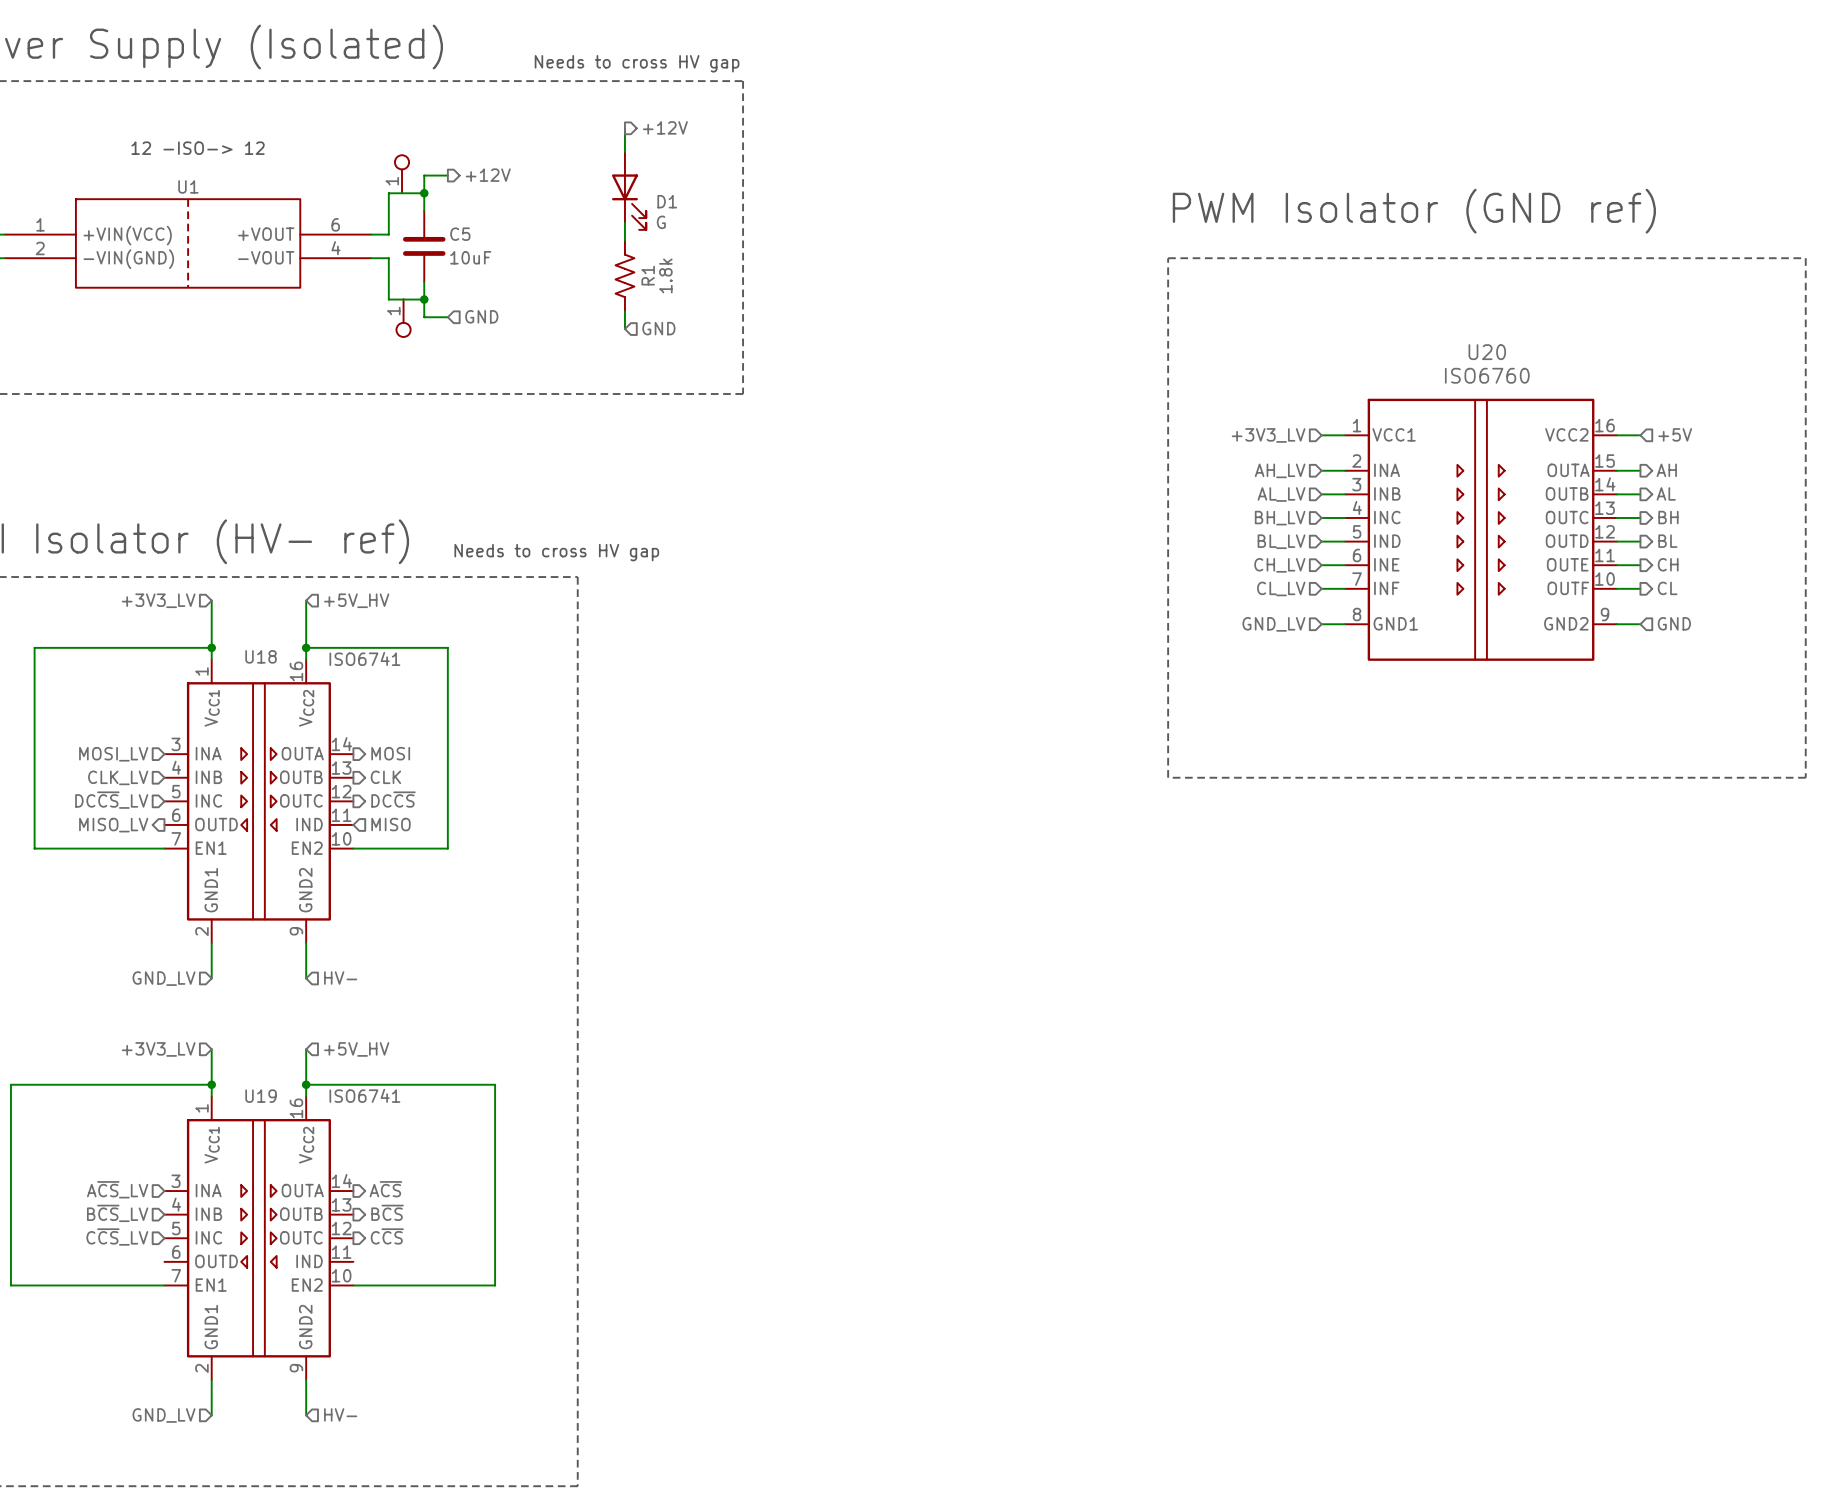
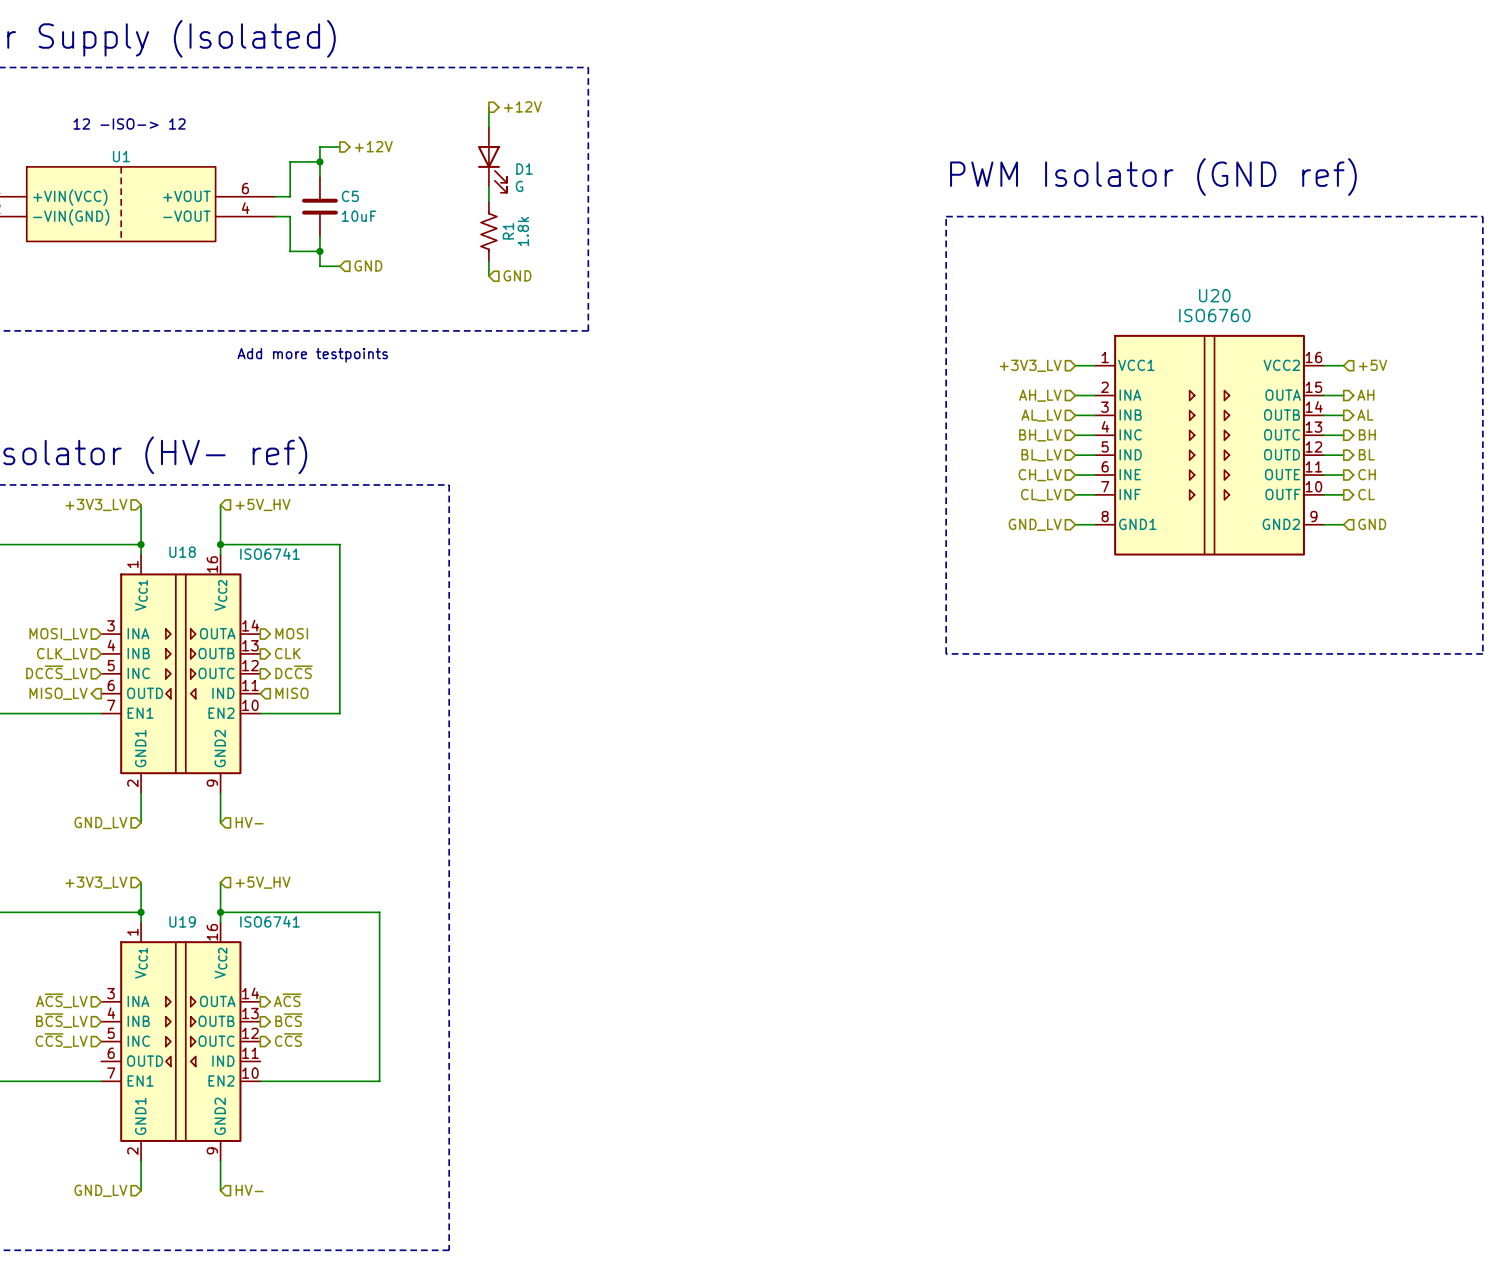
text: Needs to cross HV gap (637, 63) -> none
part: (402, 174) -> none
part: (403, 318) -> none
text: none -> Add more testpoints (312, 355)
text: Needs to cross HV gap (556, 552) -> none

